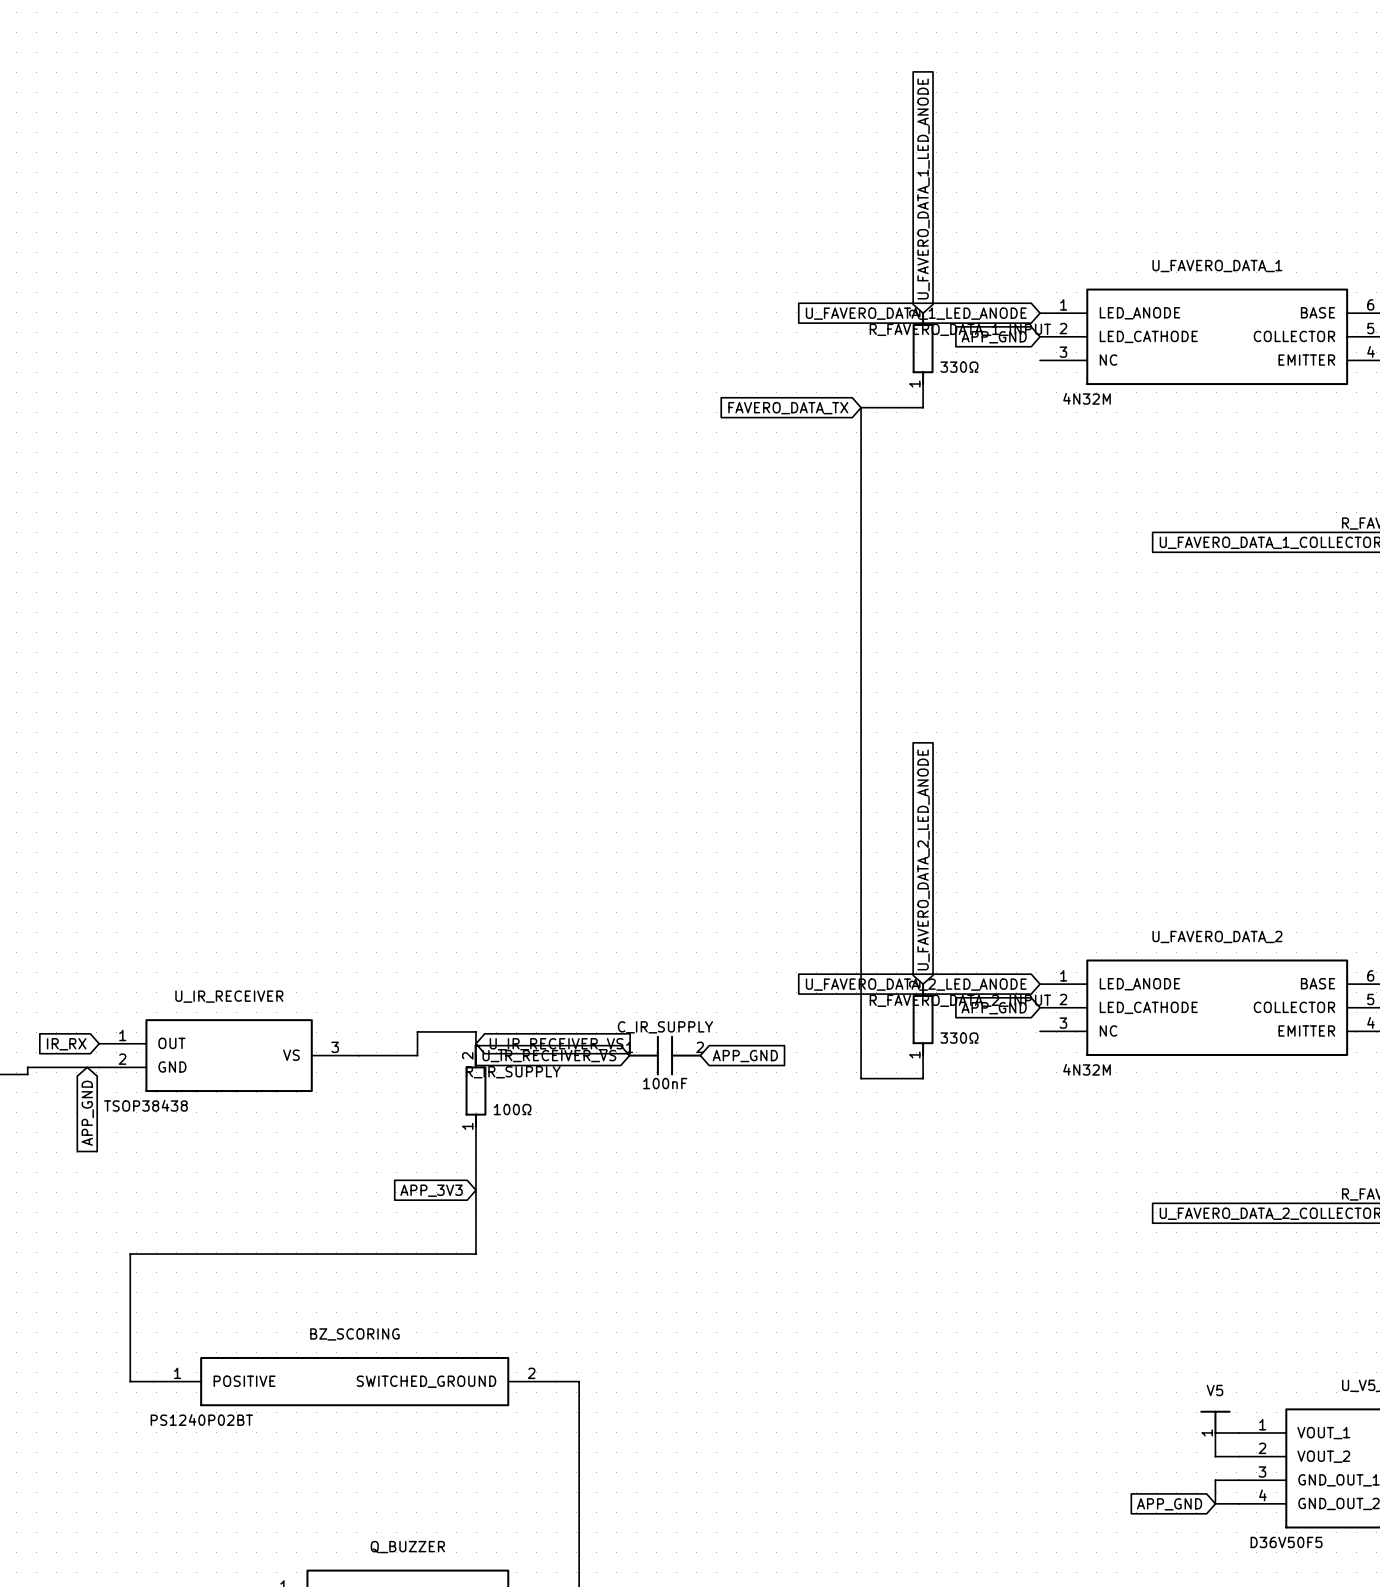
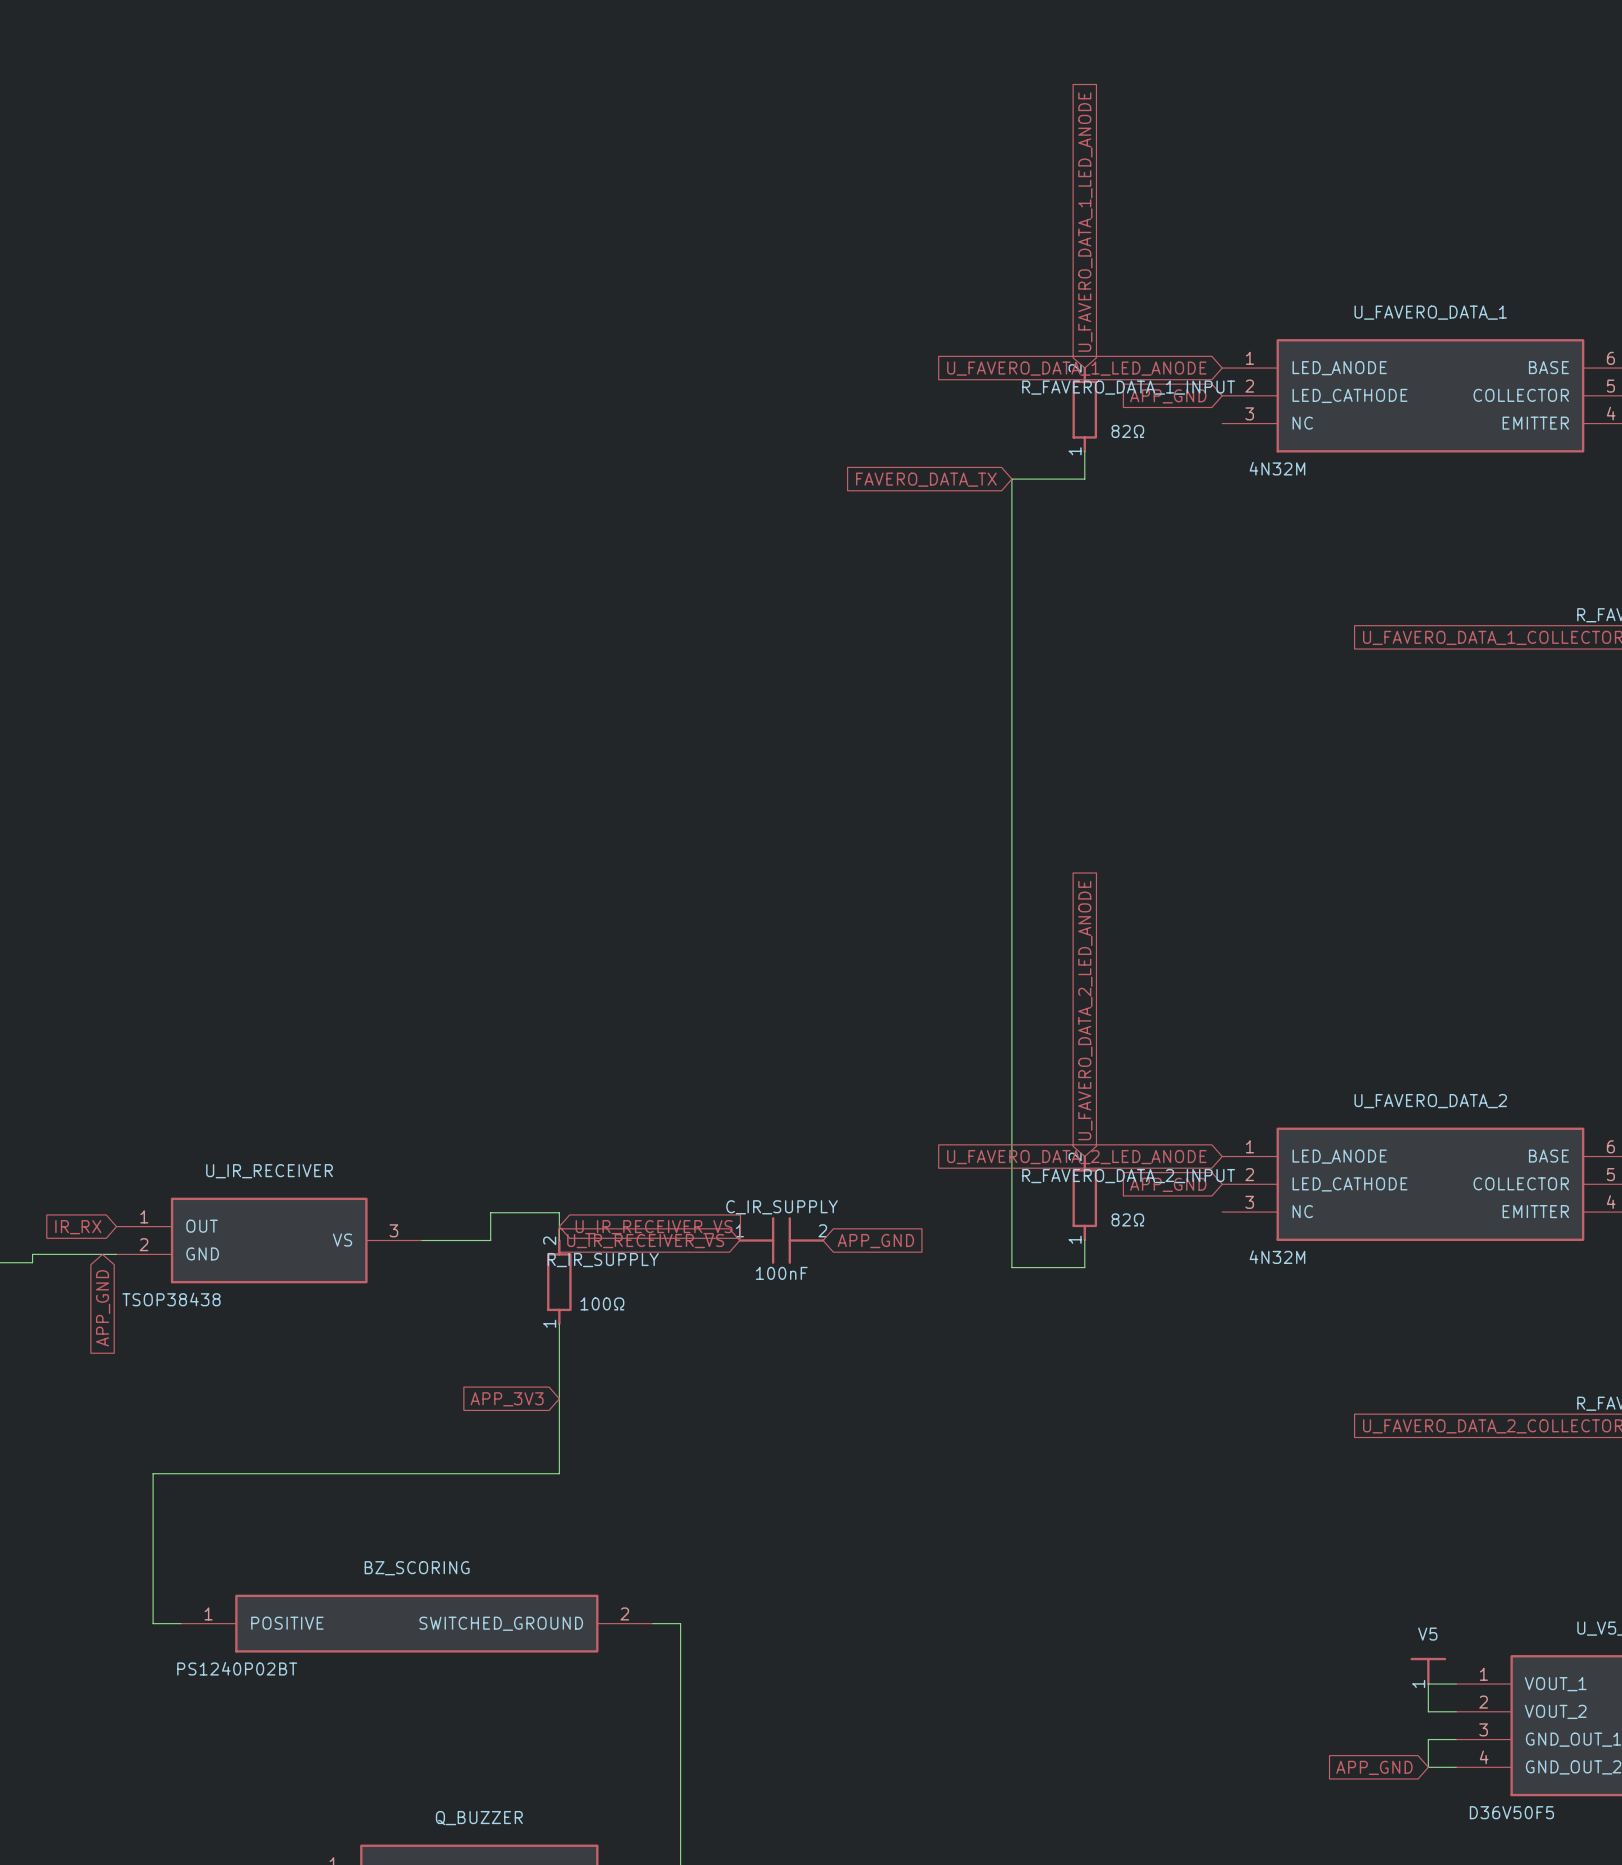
R_FAVERO_DATA_1_INPUT value: 330Ω (959, 367) -> 82Ω (1127, 431)
R_FAVERO_DATA_2_INPUT value: 330Ω (959, 1038) -> 82Ω (1127, 1219)

